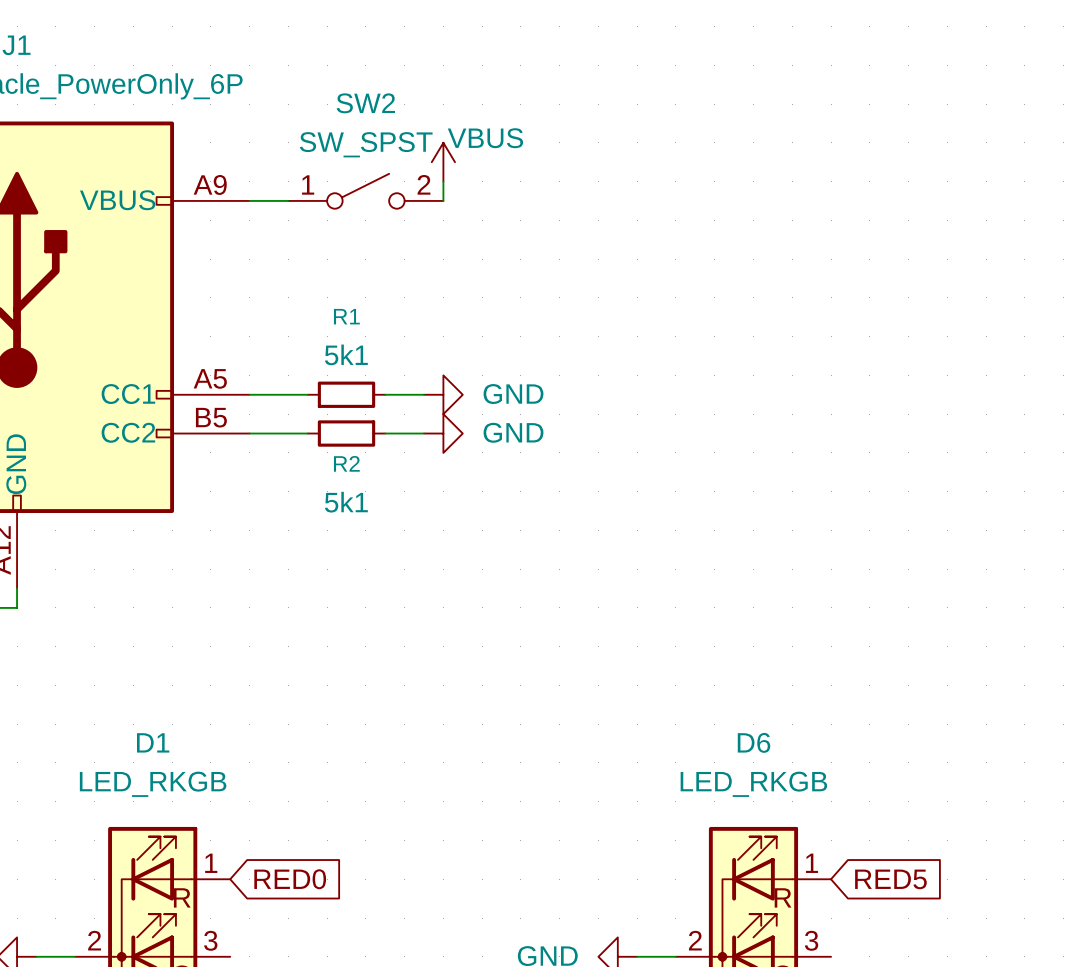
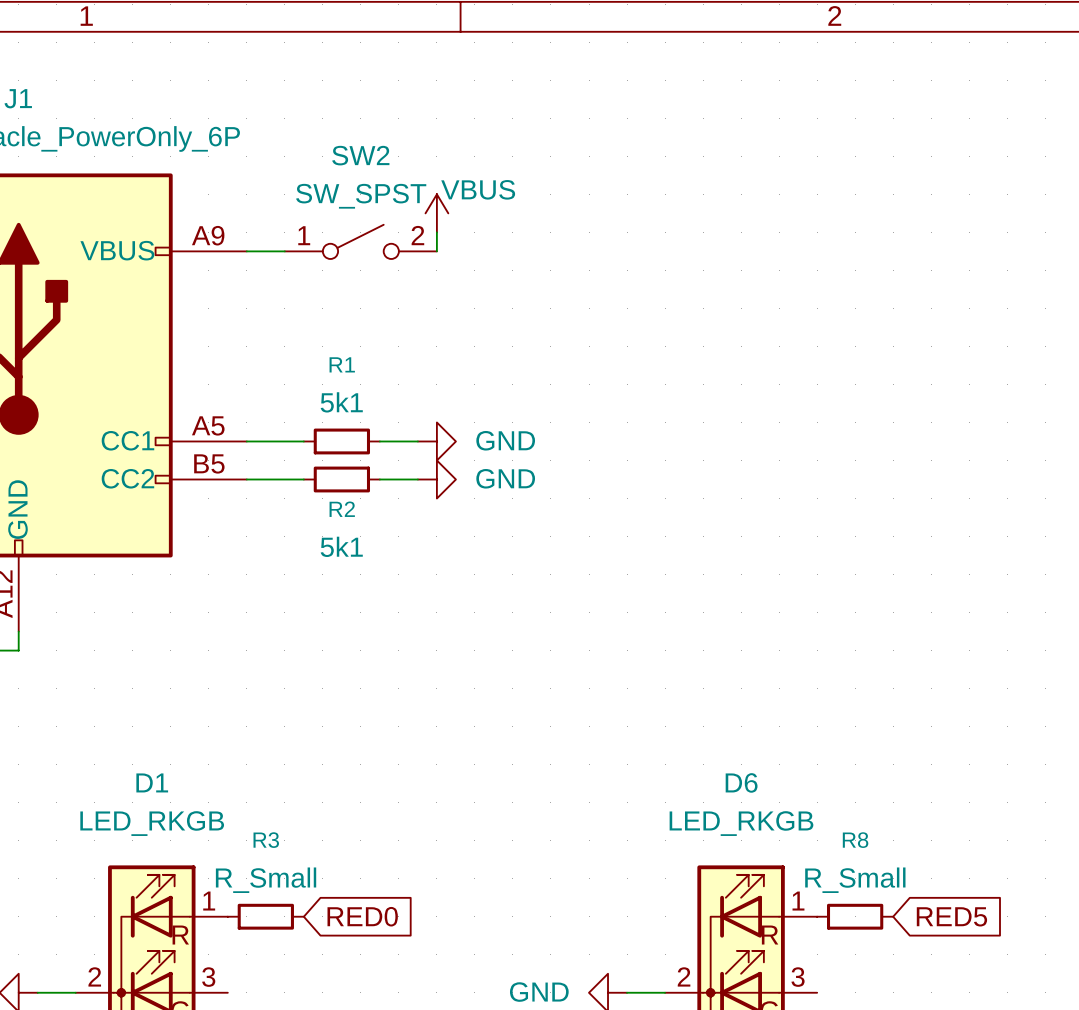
R3: none -> R_Small (265, 916)
global label position: RED0 (290, 879) -> RED0 (362, 916)
R8: none -> R_Small (855, 916)
global label position: RED5 (890, 879) -> RED5 (951, 916)

